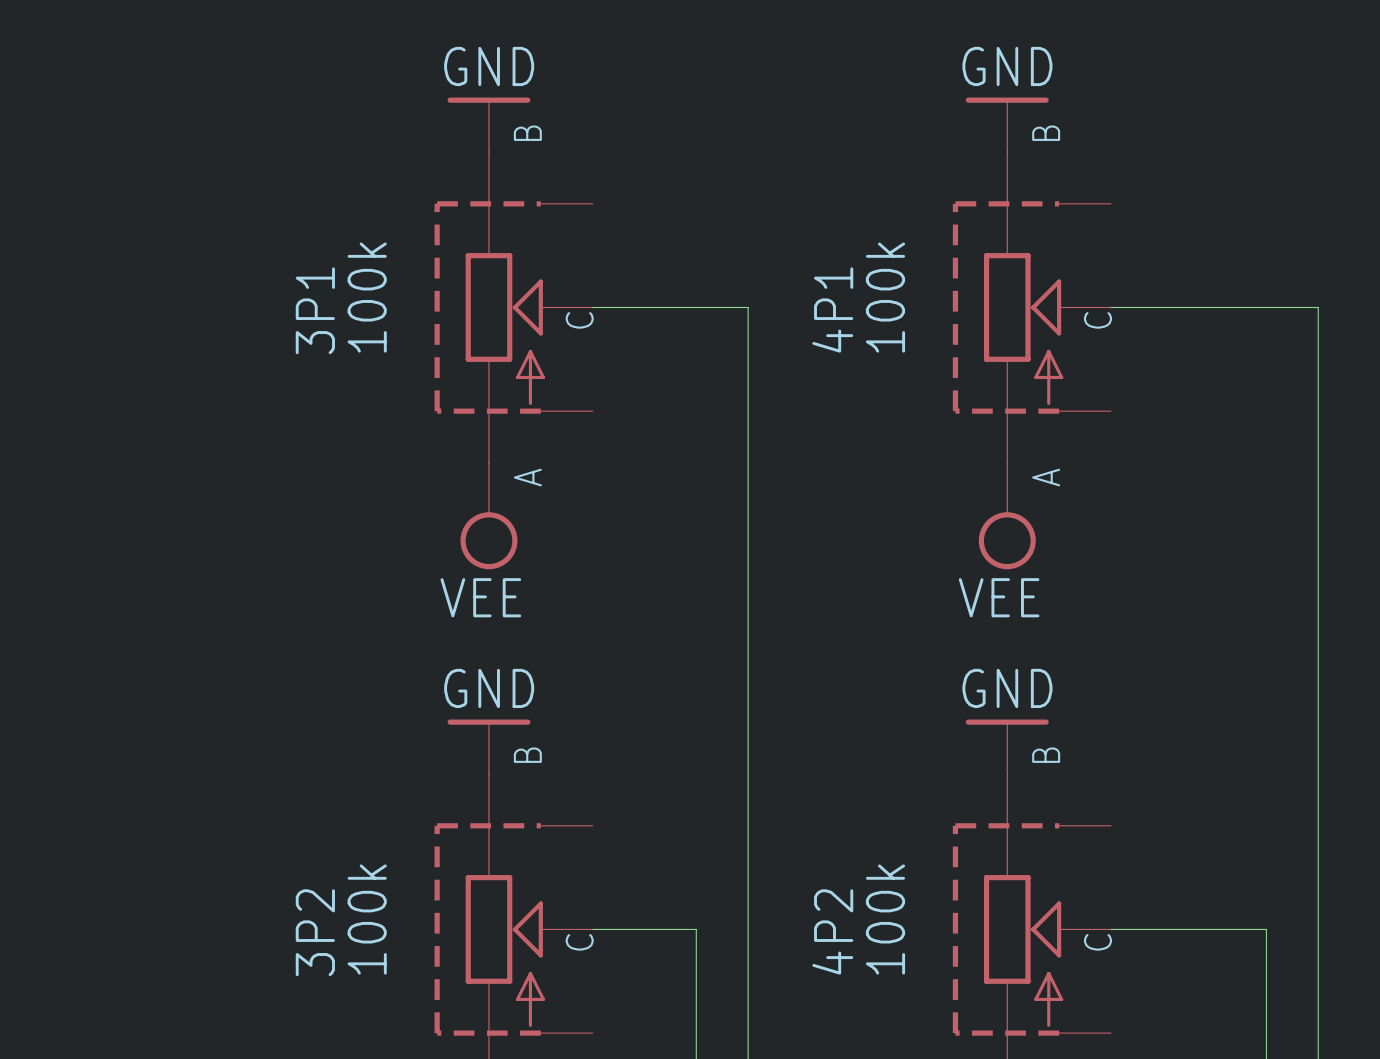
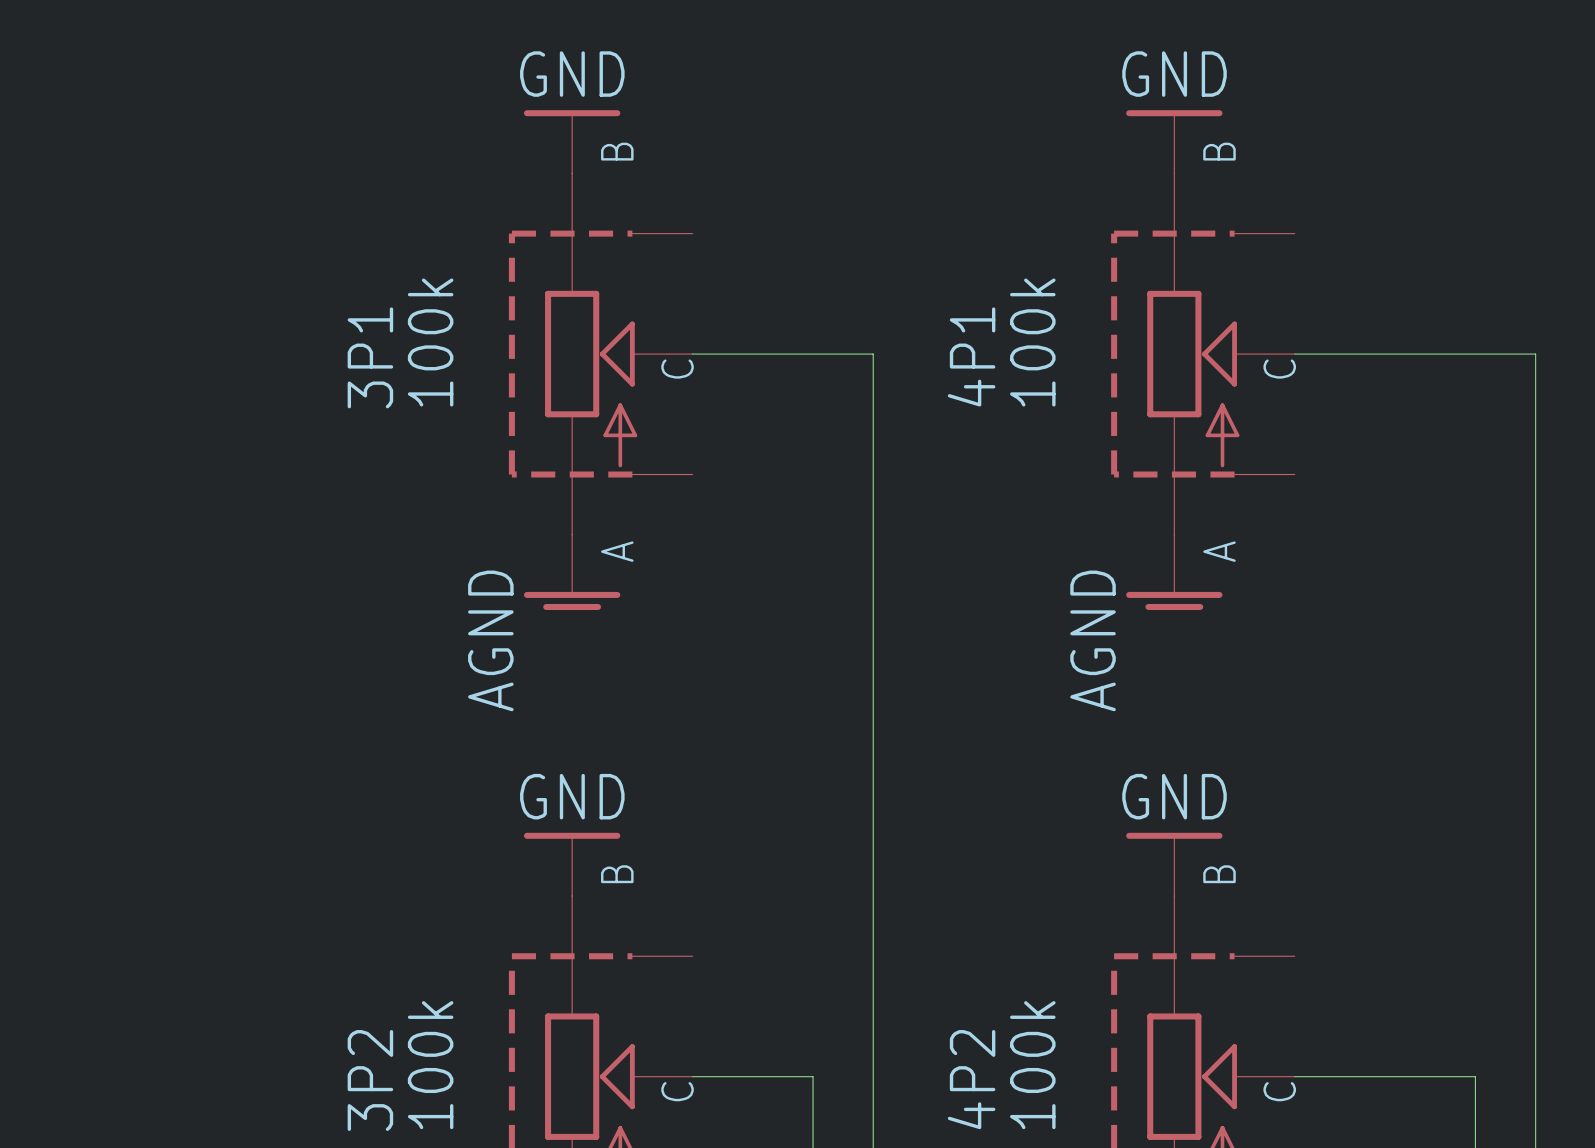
power symbol: none -> AGND (572, 572)
power symbol: none -> AGND (1174, 572)
power symbol: VEE (488, 516) -> none
power symbol: VEE (1007, 516) -> none

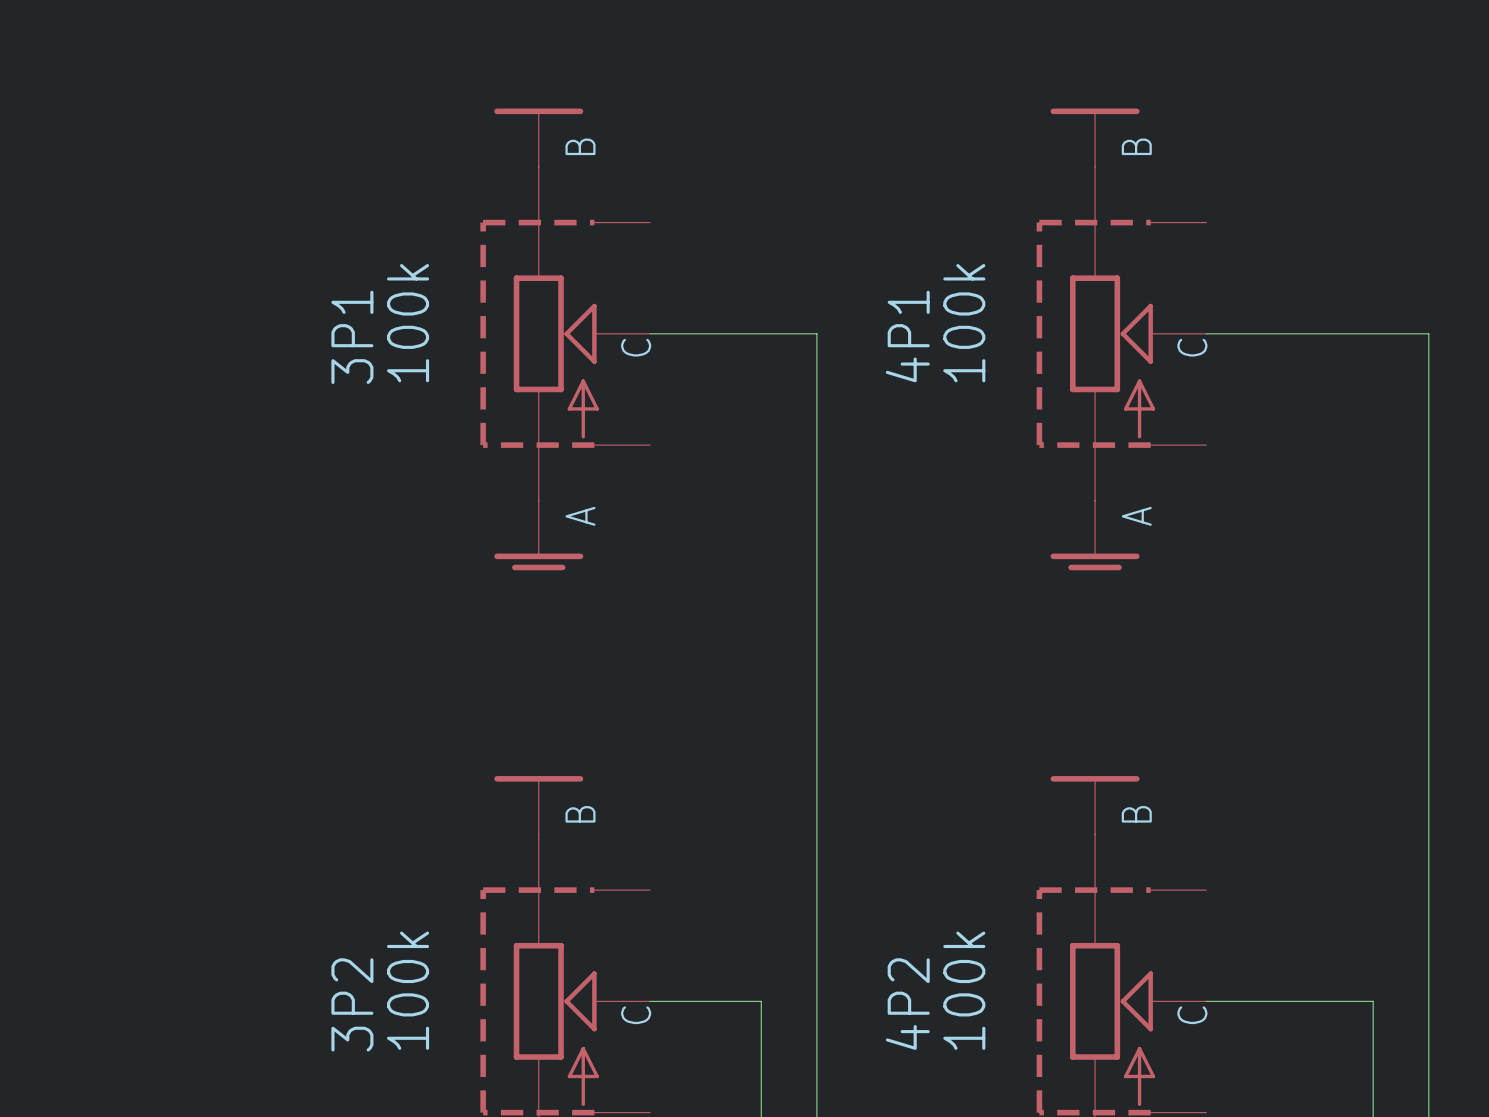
power symbol text: GND (572, 74) -> none
power symbol text: GND (1174, 74) -> none
power symbol text: AGND (490, 640) -> none
power symbol text: AGND (1093, 640) -> none
power symbol text: GND (572, 796) -> none
power symbol text: GND (1174, 796) -> none

